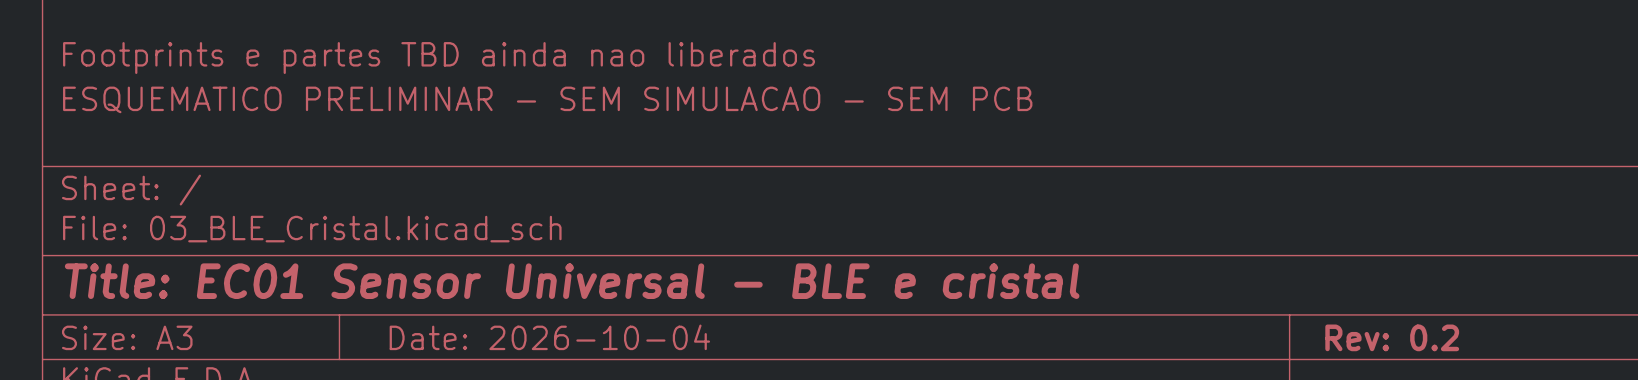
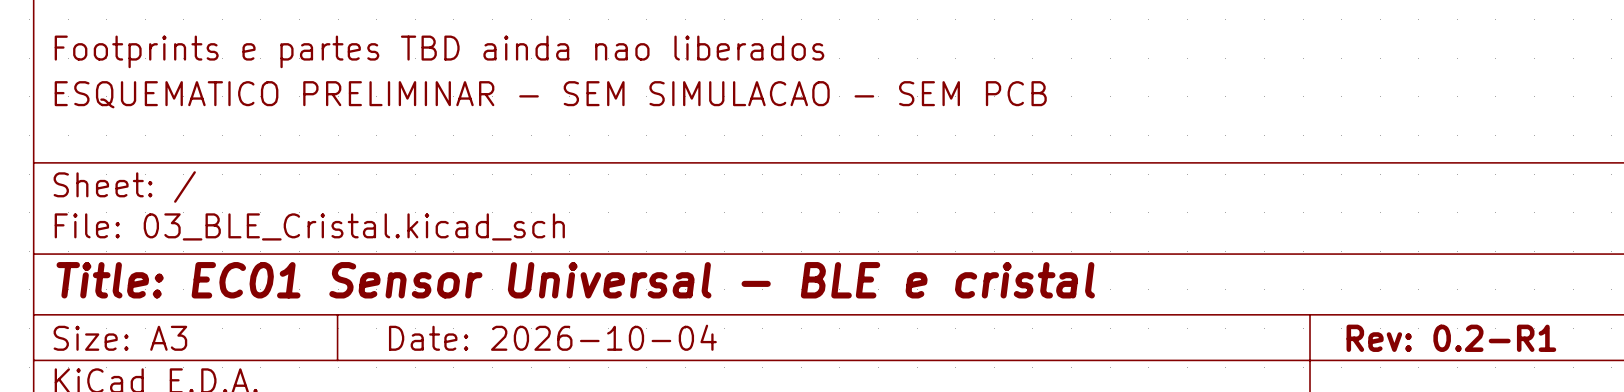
title block: Rev: 0.2 (1392, 337) -> Rev: 0.2-R1 (1451, 338)

